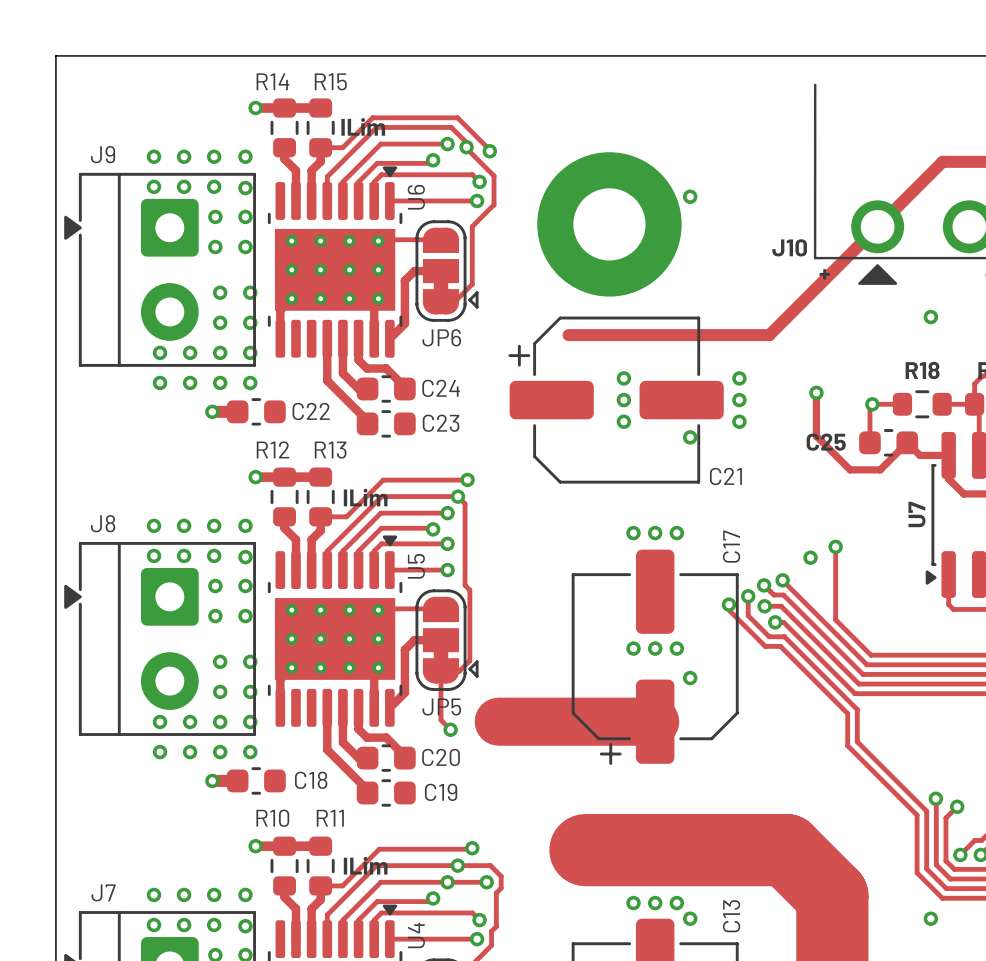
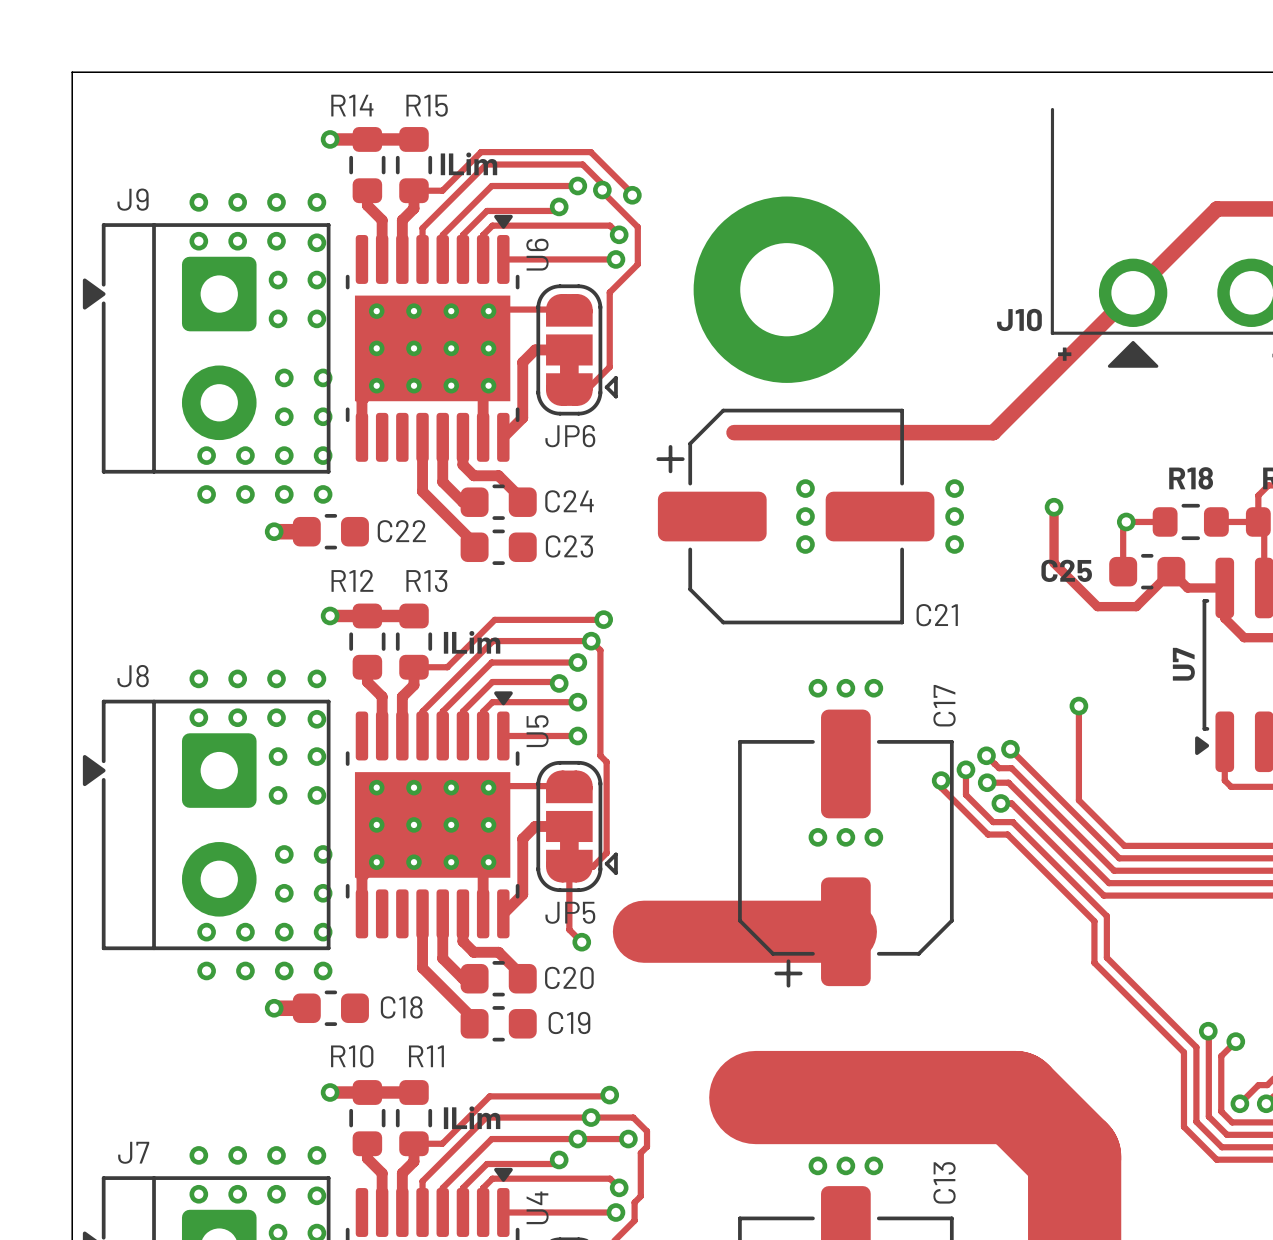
via: (690, 196) -> none
via: (930, 317) -> none
via: (690, 437) -> none
via: (810, 557) -> none
via: (690, 678) -> none
via: (690, 918) -> none
via: (930, 918) -> none

